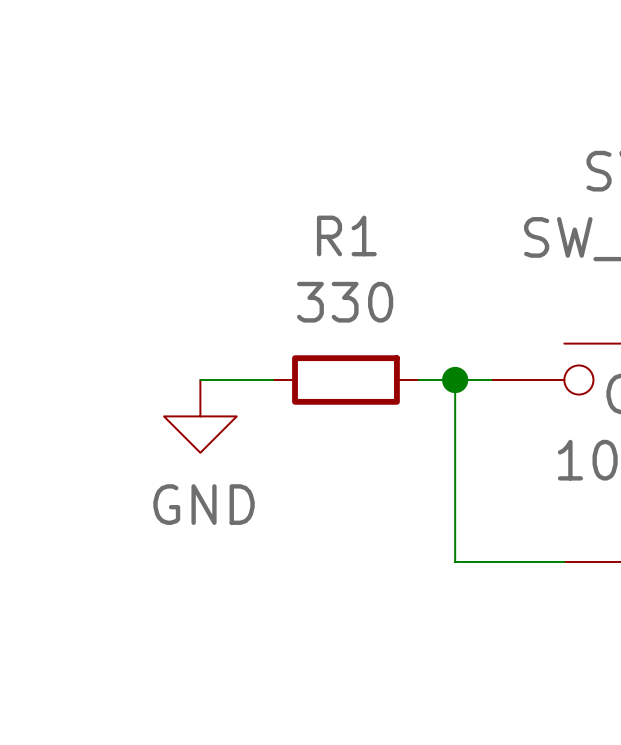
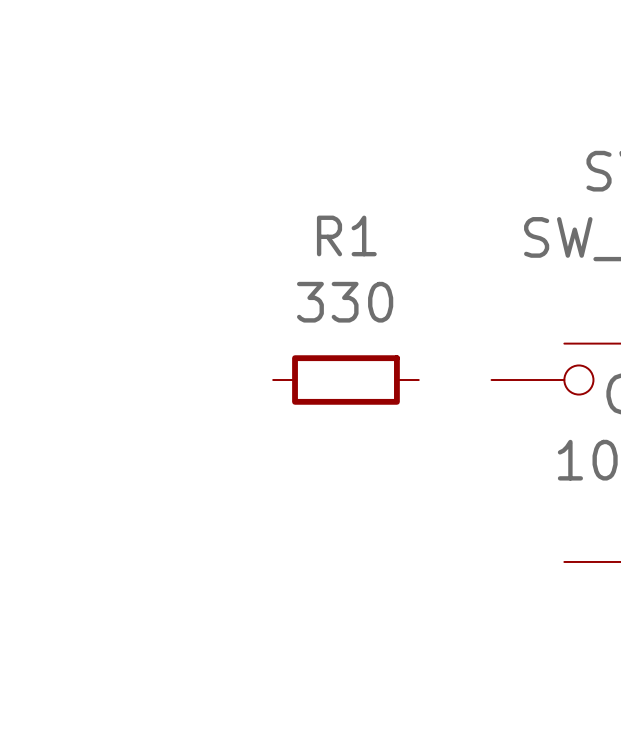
wire: (200, 380) (273, 380) -> none
wire: (418, 380) (491, 380) -> none
wire: (455, 380) (455, 561) (564, 561) -> none
junction: (455, 380) -> none
power symbol: GND (200, 416) -> none

